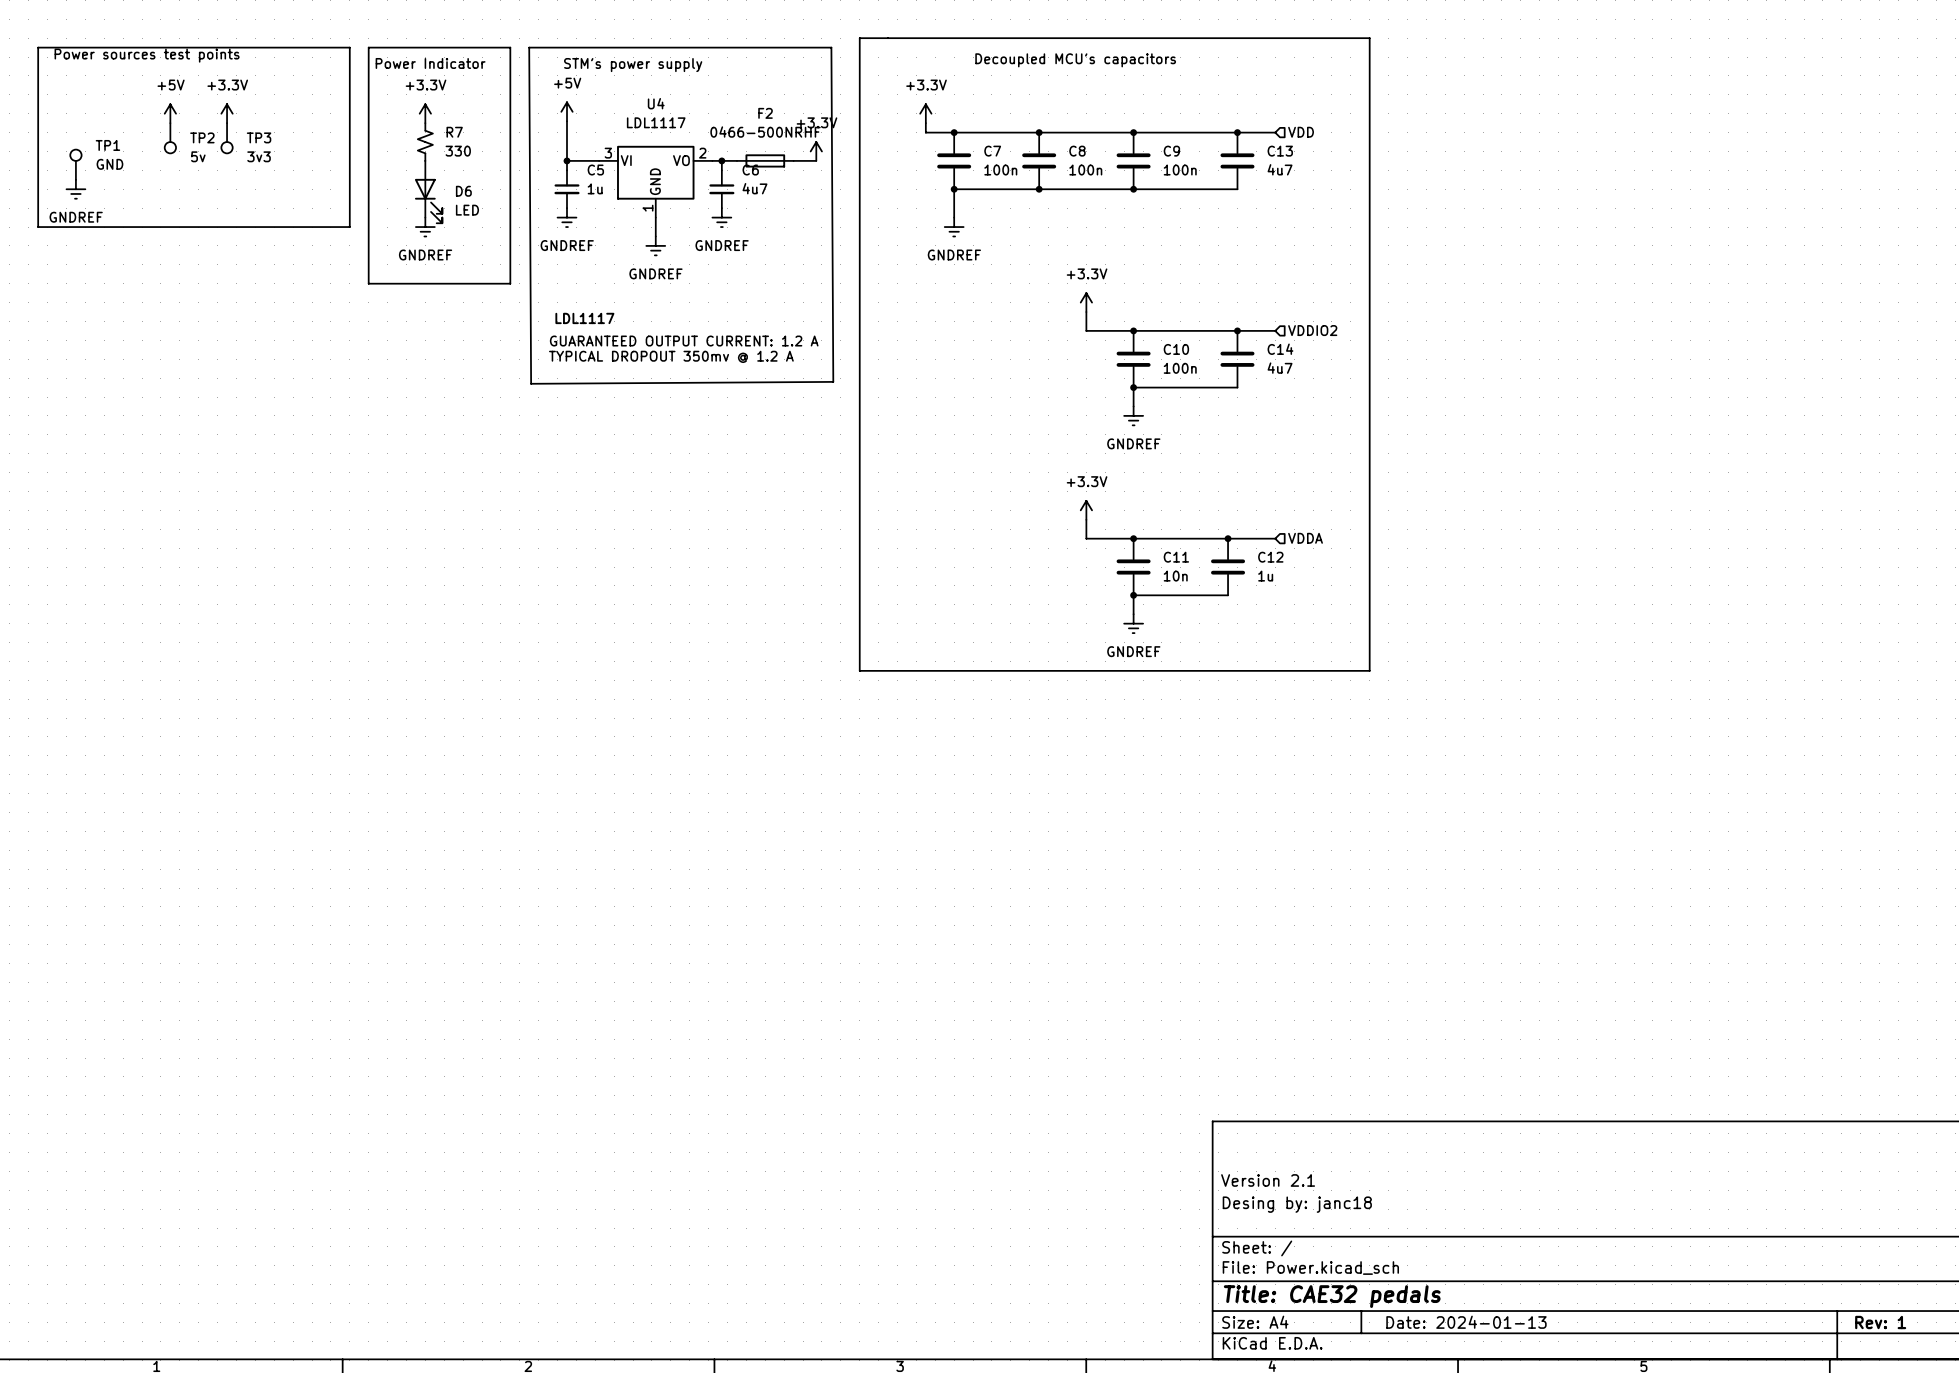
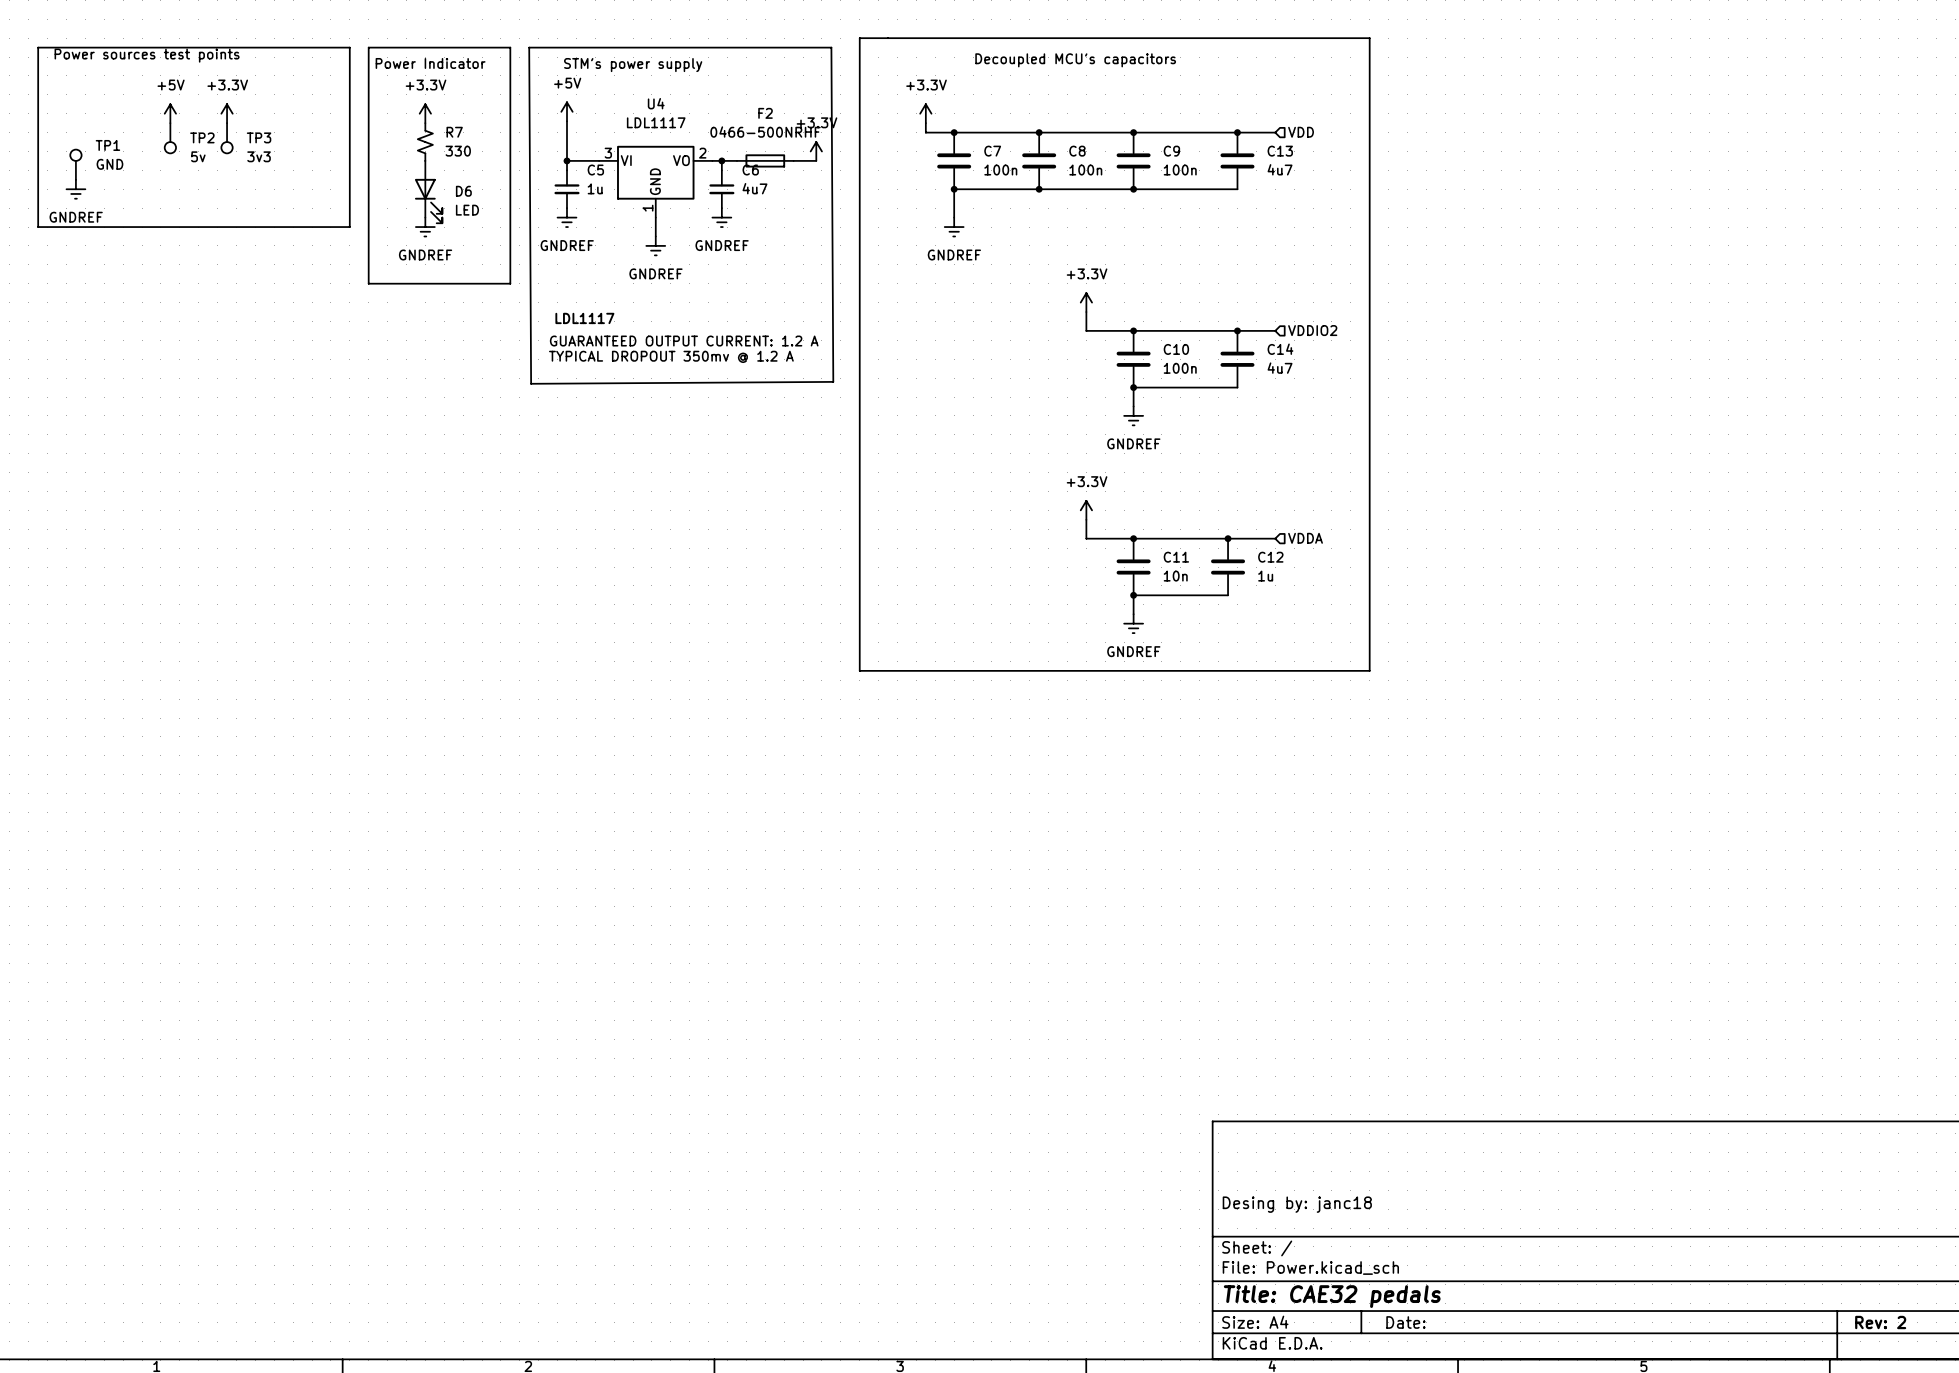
title block: Version 2.1 (1268, 1180) -> none
title block: Date: 2024-01-13 (1466, 1322) -> Date: (1405, 1322)
title block: Rev: 1 (1880, 1322) -> Rev: 2 (1880, 1322)

